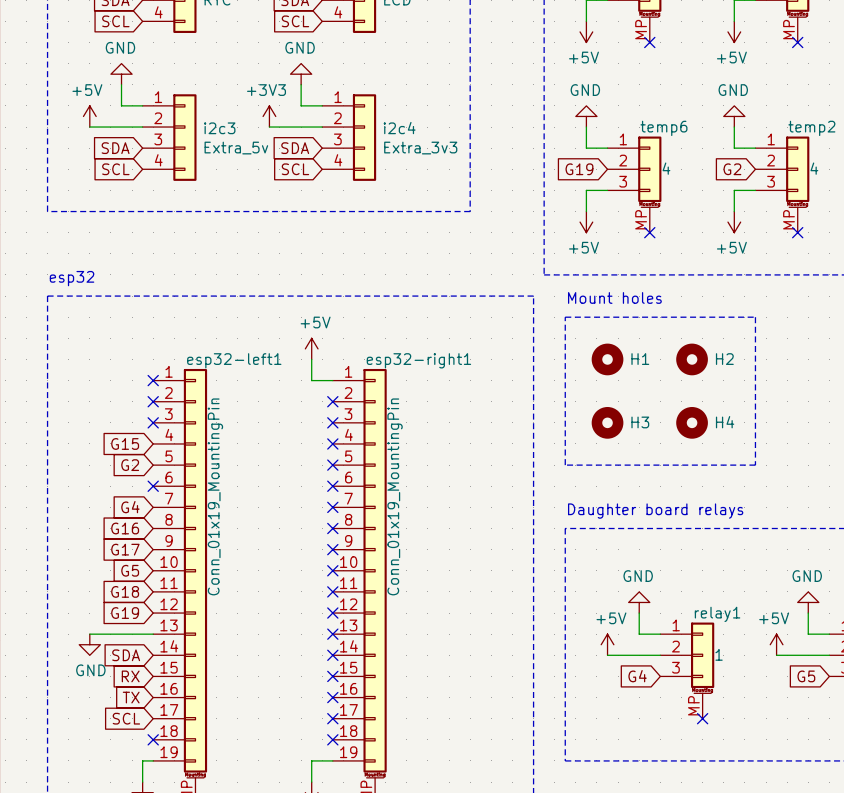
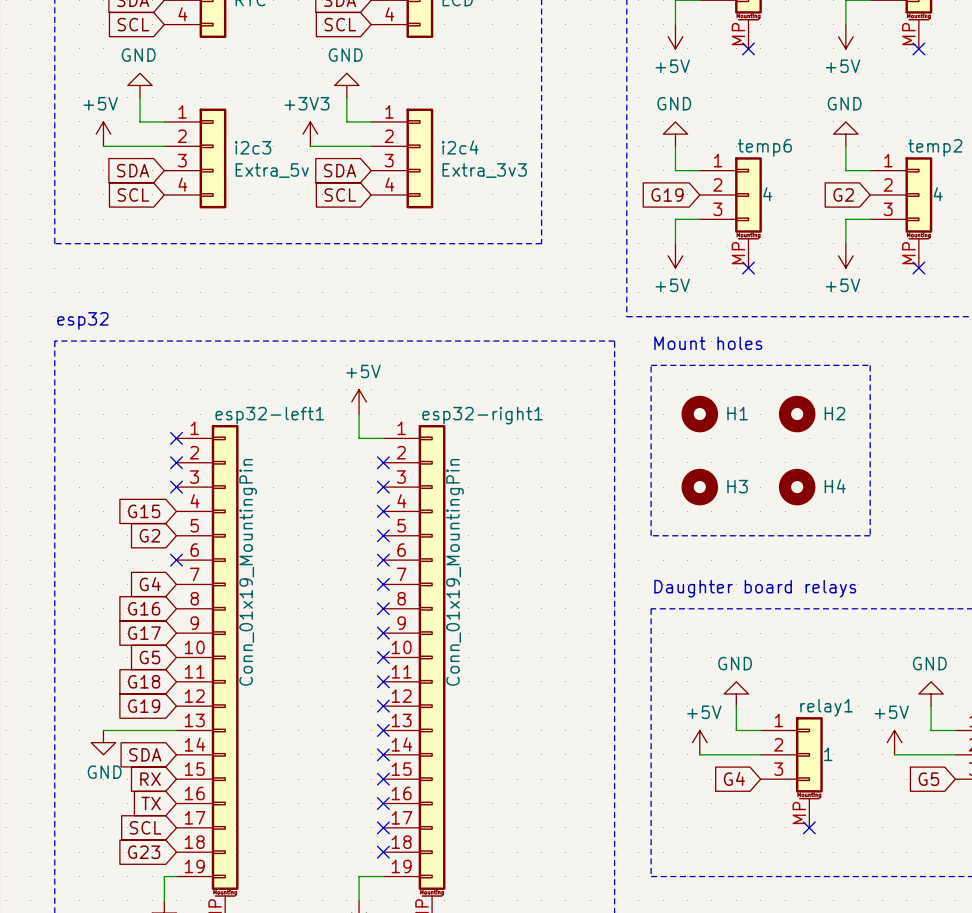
global label: none -> G23 (144, 852)
no-connect mark: (153, 739) -> none

